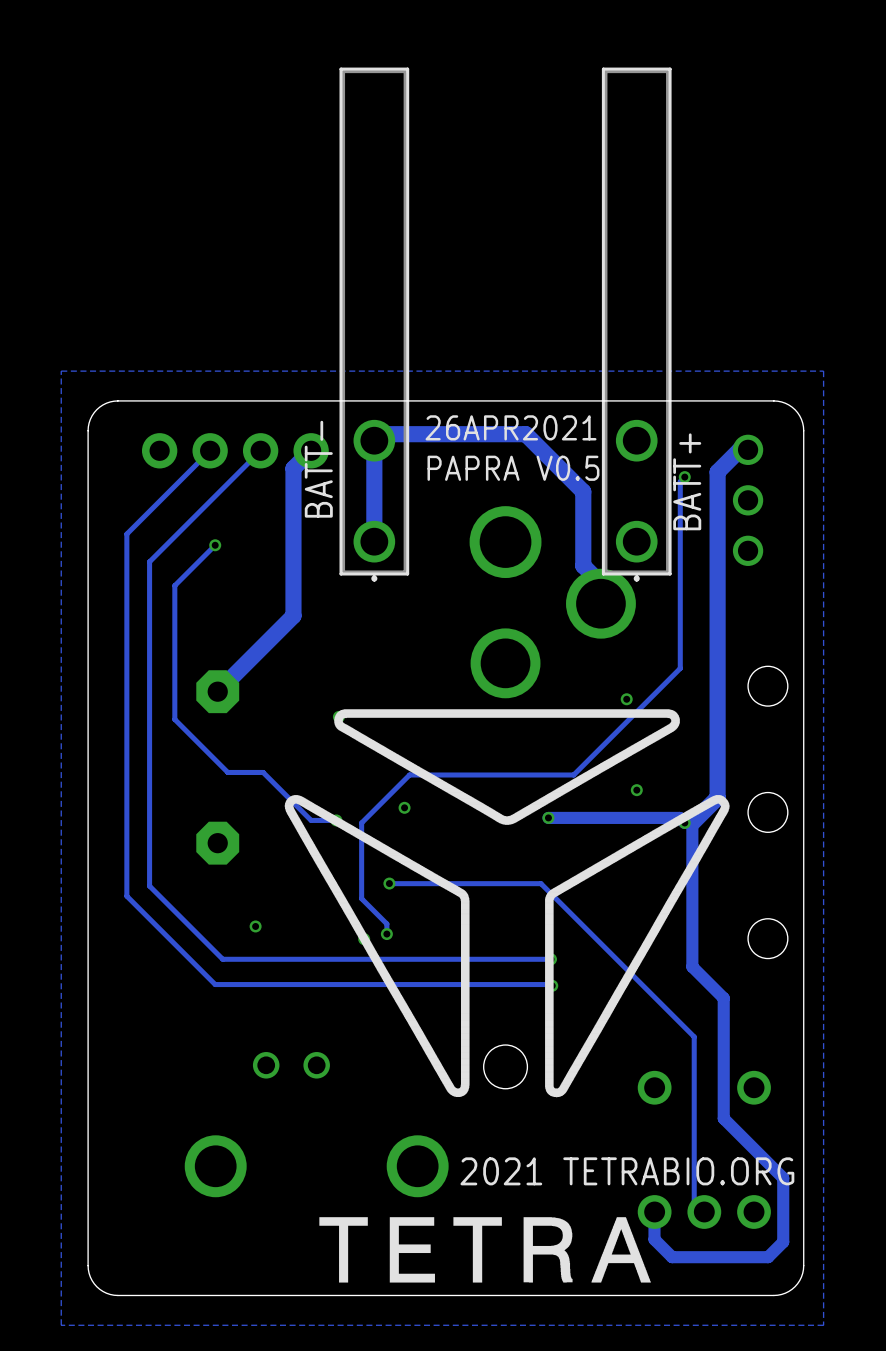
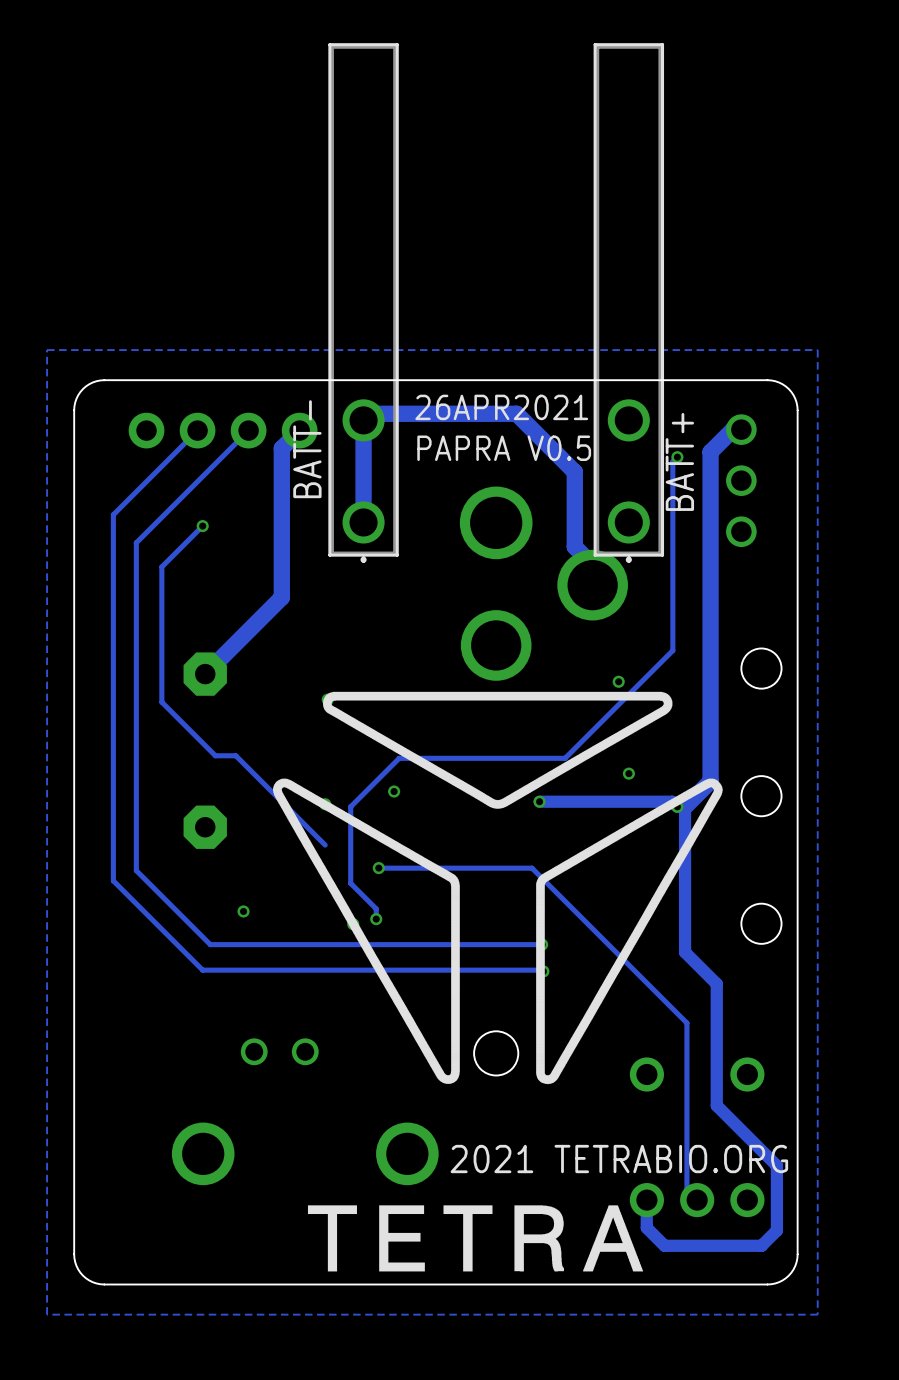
track: (248, 772) (263, 772) (311, 820) (336, 820) -> (235, 755) (325, 845)

